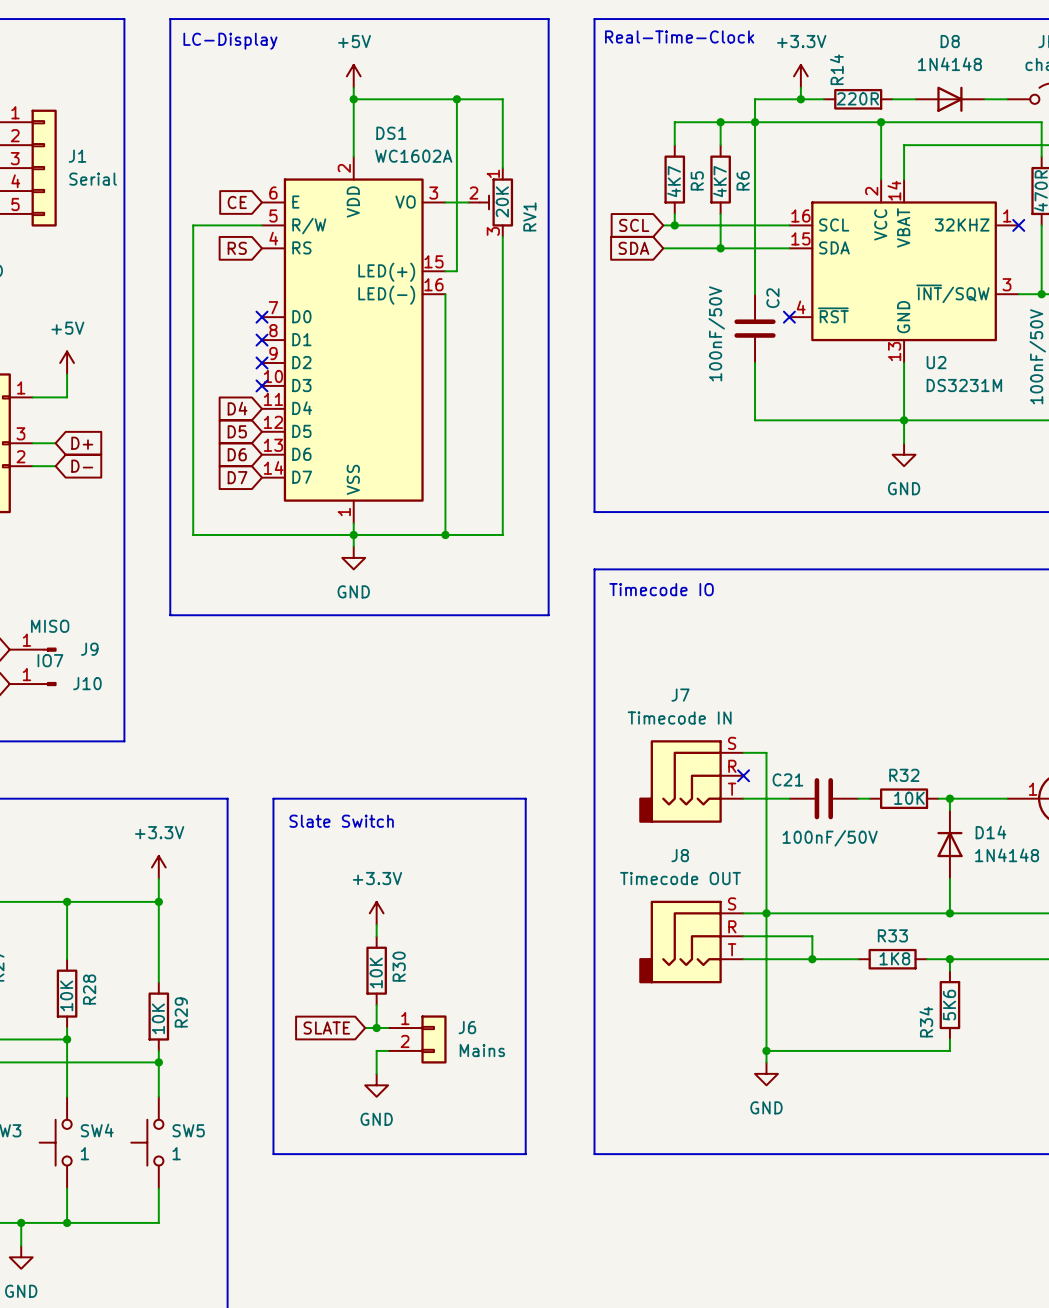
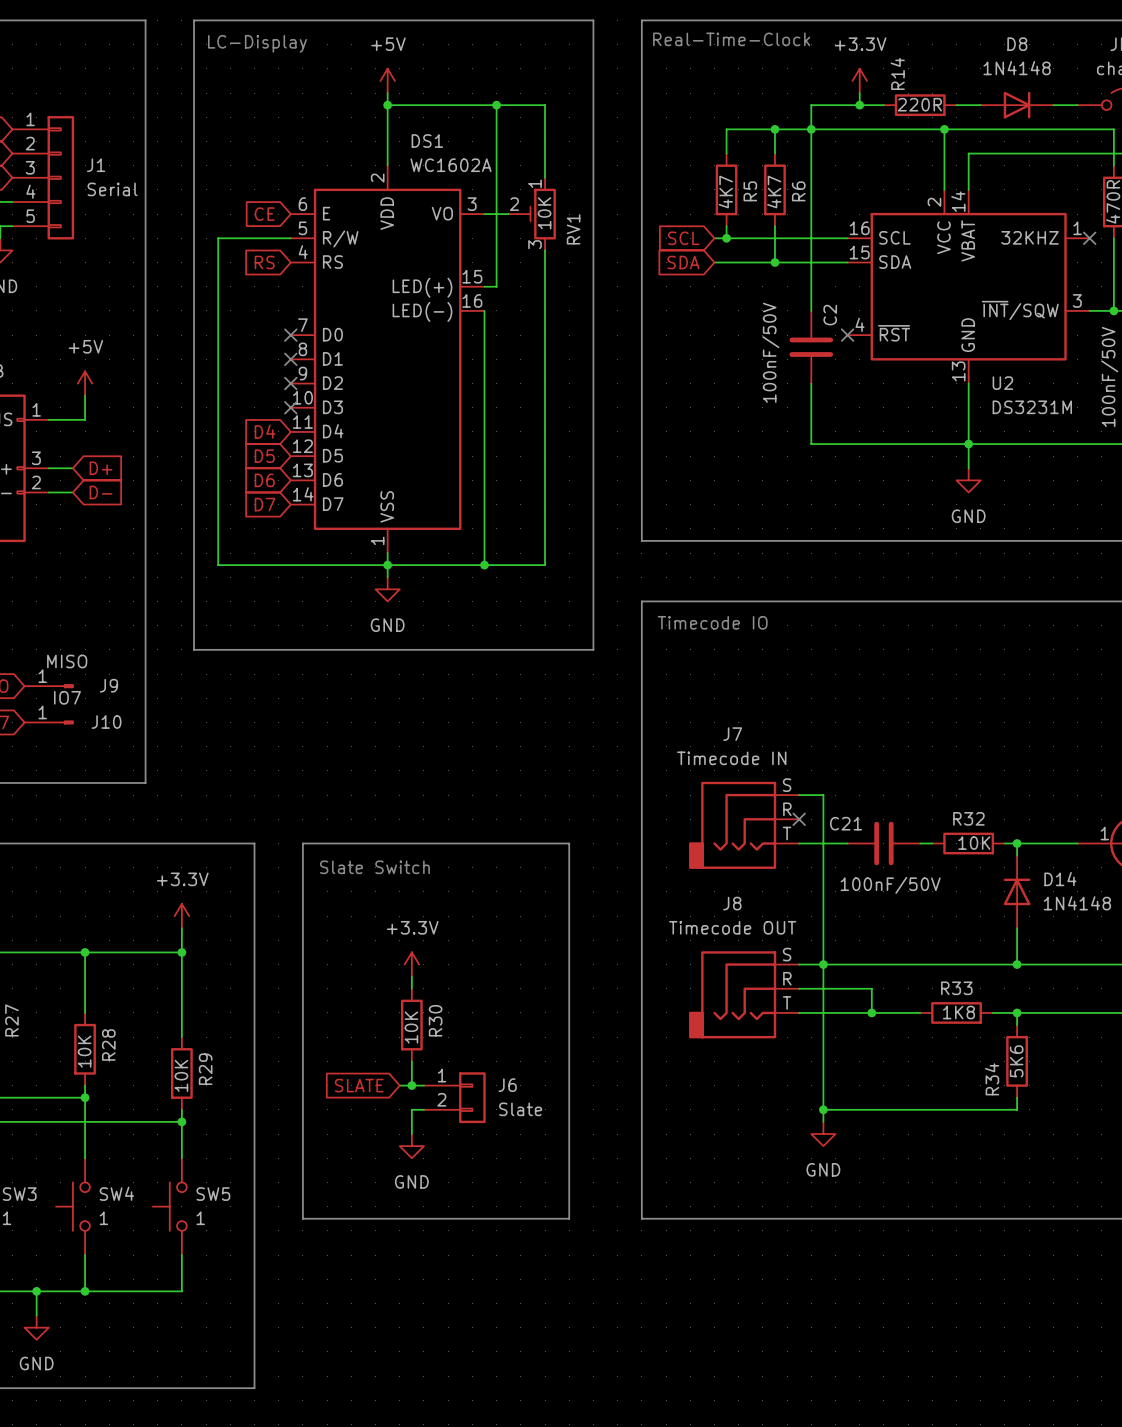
RV1 value: 20K (502, 201) -> 10K (544, 213)
J6 value: Mains (482, 1050) -> Slate (520, 1109)

